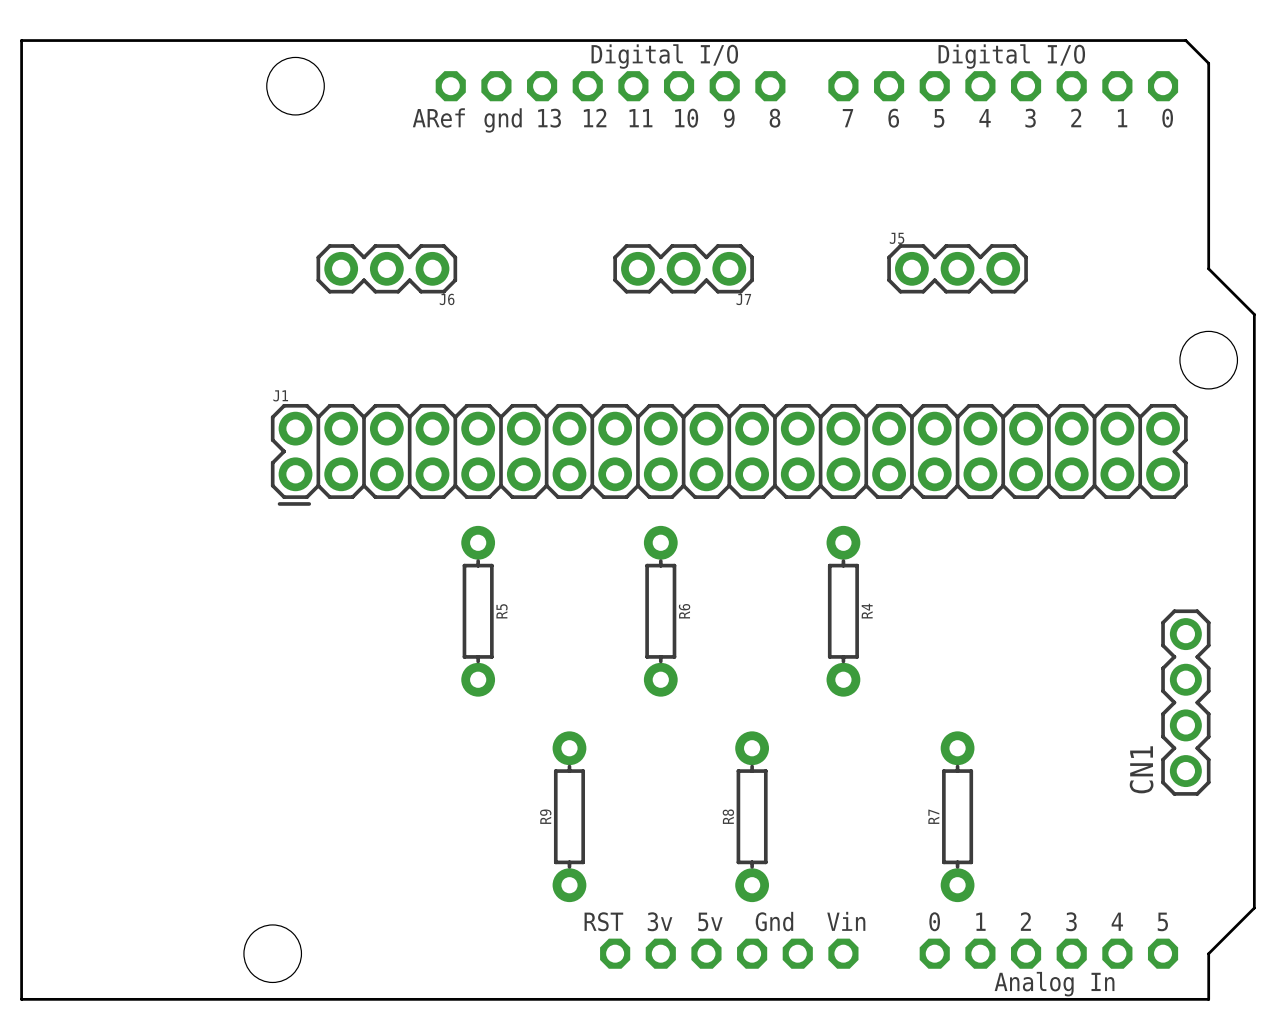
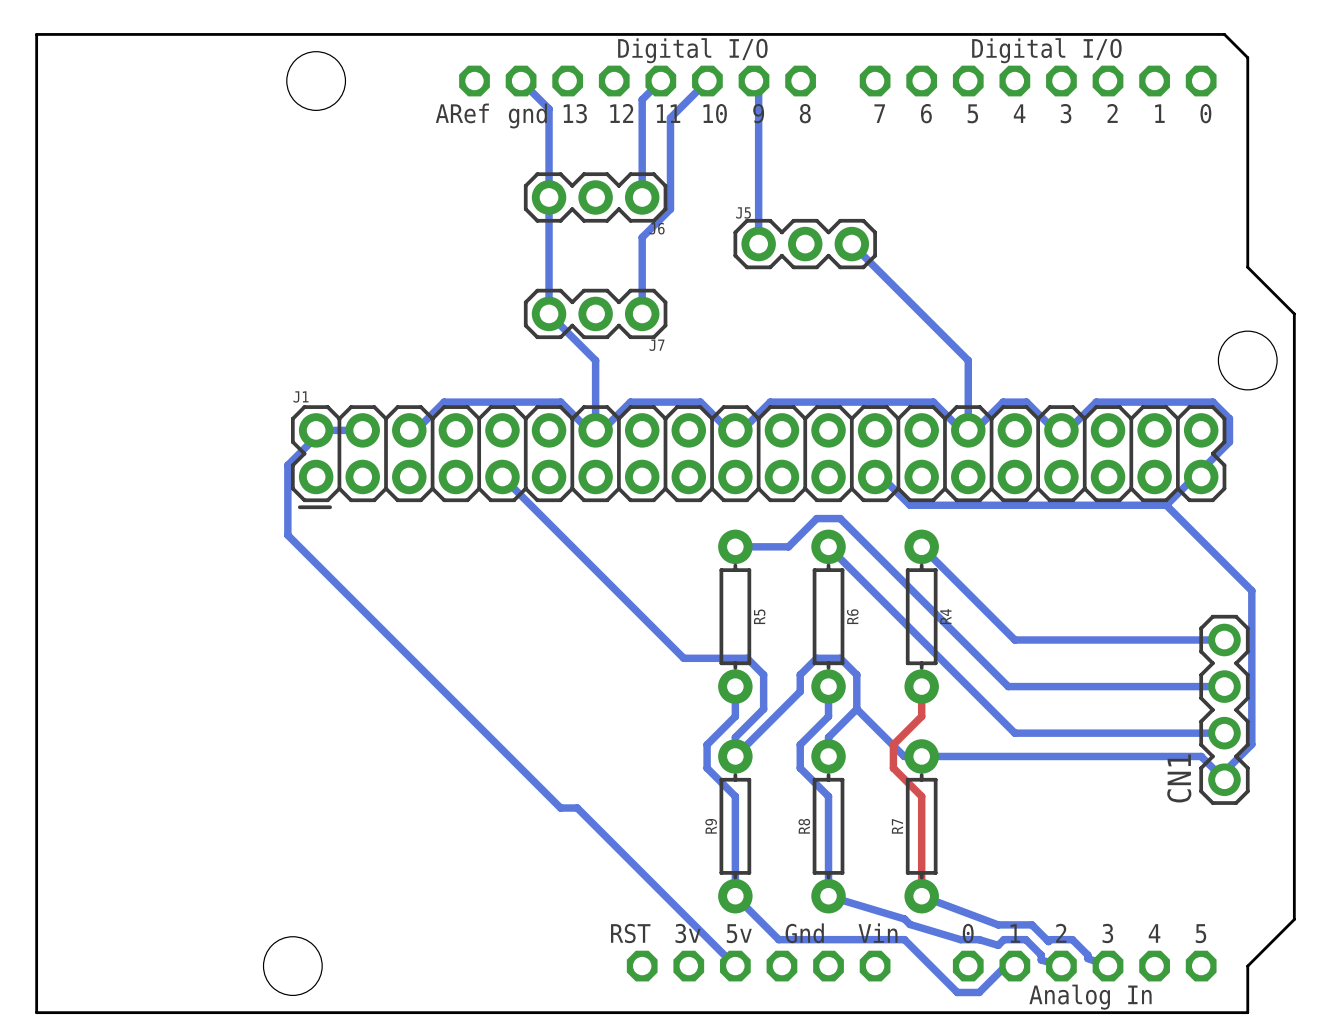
bottom track: none -> (521, 81) (549, 108) (549, 313) (595, 360) (595, 430)
bottom track: none -> (660, 81) (642, 99) (642, 197)
bottom track: none -> (707, 81) (670, 117) (670, 209) (642, 237) (642, 313)
bottom track: none -> (753, 81) (758, 81) (758, 244)
bottom track: none -> (851, 244) (968, 360) (968, 430)
J6 position: (386, 268) -> (595, 197)
J7 position: (683, 268) -> (595, 313)
J5 position: (957, 268) -> (805, 244)
bottom track: none -> (362, 430) (316, 430) (316, 436) (287, 465) (287, 535) (560, 808) (577, 808) (735, 966)
bottom track: none -> (409, 430) (415, 430) (444, 402) (560, 402) (589, 430) (602, 430) (630, 402) (700, 402) (728, 430) (741, 430) (770, 402) (933, 402) (961, 430) (974, 430) (1003, 402) (1026, 402) (1054, 430) (1068, 430) (1096, 402) (1212, 402) (1229, 418) (1229, 442) (1201, 470) (1201, 476) (1194, 476) (1166, 505)
bottom track: none -> (502, 476) (683, 658) (747, 658) (763, 674) (763, 709) (735, 737) (735, 756) (800, 691) (800, 674) (816, 658) (840, 658) (856, 674) (856, 709)
bottom track: none -> (875, 476) (881, 476) (909, 505) (1166, 505)
bottom track: none -> (1166, 505) (1251, 590) (1251, 744) (1224, 771) (1224, 779) (1201, 756) (904, 756) (856, 709)
bottom track: none -> (735, 546) (788, 546) (816, 518) (840, 518) (1008, 686) (1224, 686)
bottom track: none -> (828, 546) (1014, 733) (1224, 733)
bottom track: none -> (921, 546) (1014, 640) (1224, 640)
R5 position: (478, 611) -> (735, 616)
R6 position: (660, 611) -> (828, 616)
R4 position: (843, 611) -> (921, 616)
bottom track: none -> (735, 686) (735, 716) (707, 744) (707, 768) (735, 796) (735, 896) (778, 939) (904, 939) (957, 992) (979, 992) (1005, 966) (1014, 966)
bottom track: none -> (828, 686) (828, 716) (800, 744) (800, 768) (828, 796) (828, 896) (904, 918) (909, 924) (960, 939) (979, 939) (998, 945) (1003, 939) (1025, 939) (1041, 955) (1041, 960) (1061, 966)
top track: none -> (921, 686) (921, 716) (893, 744) (893, 768) (921, 796) (921, 896)
bottom track: none -> (856, 709) (828, 737) (828, 756)
R9 position: (569, 816) -> (735, 826)
R8 position: (752, 816) -> (828, 826)
R7 position: (957, 816) -> (921, 826)
bottom track: none -> (921, 896) (998, 924) (1031, 924) (1048, 941) (1050, 939) (1072, 939) (1087, 955) (1087, 958) (1108, 966)

